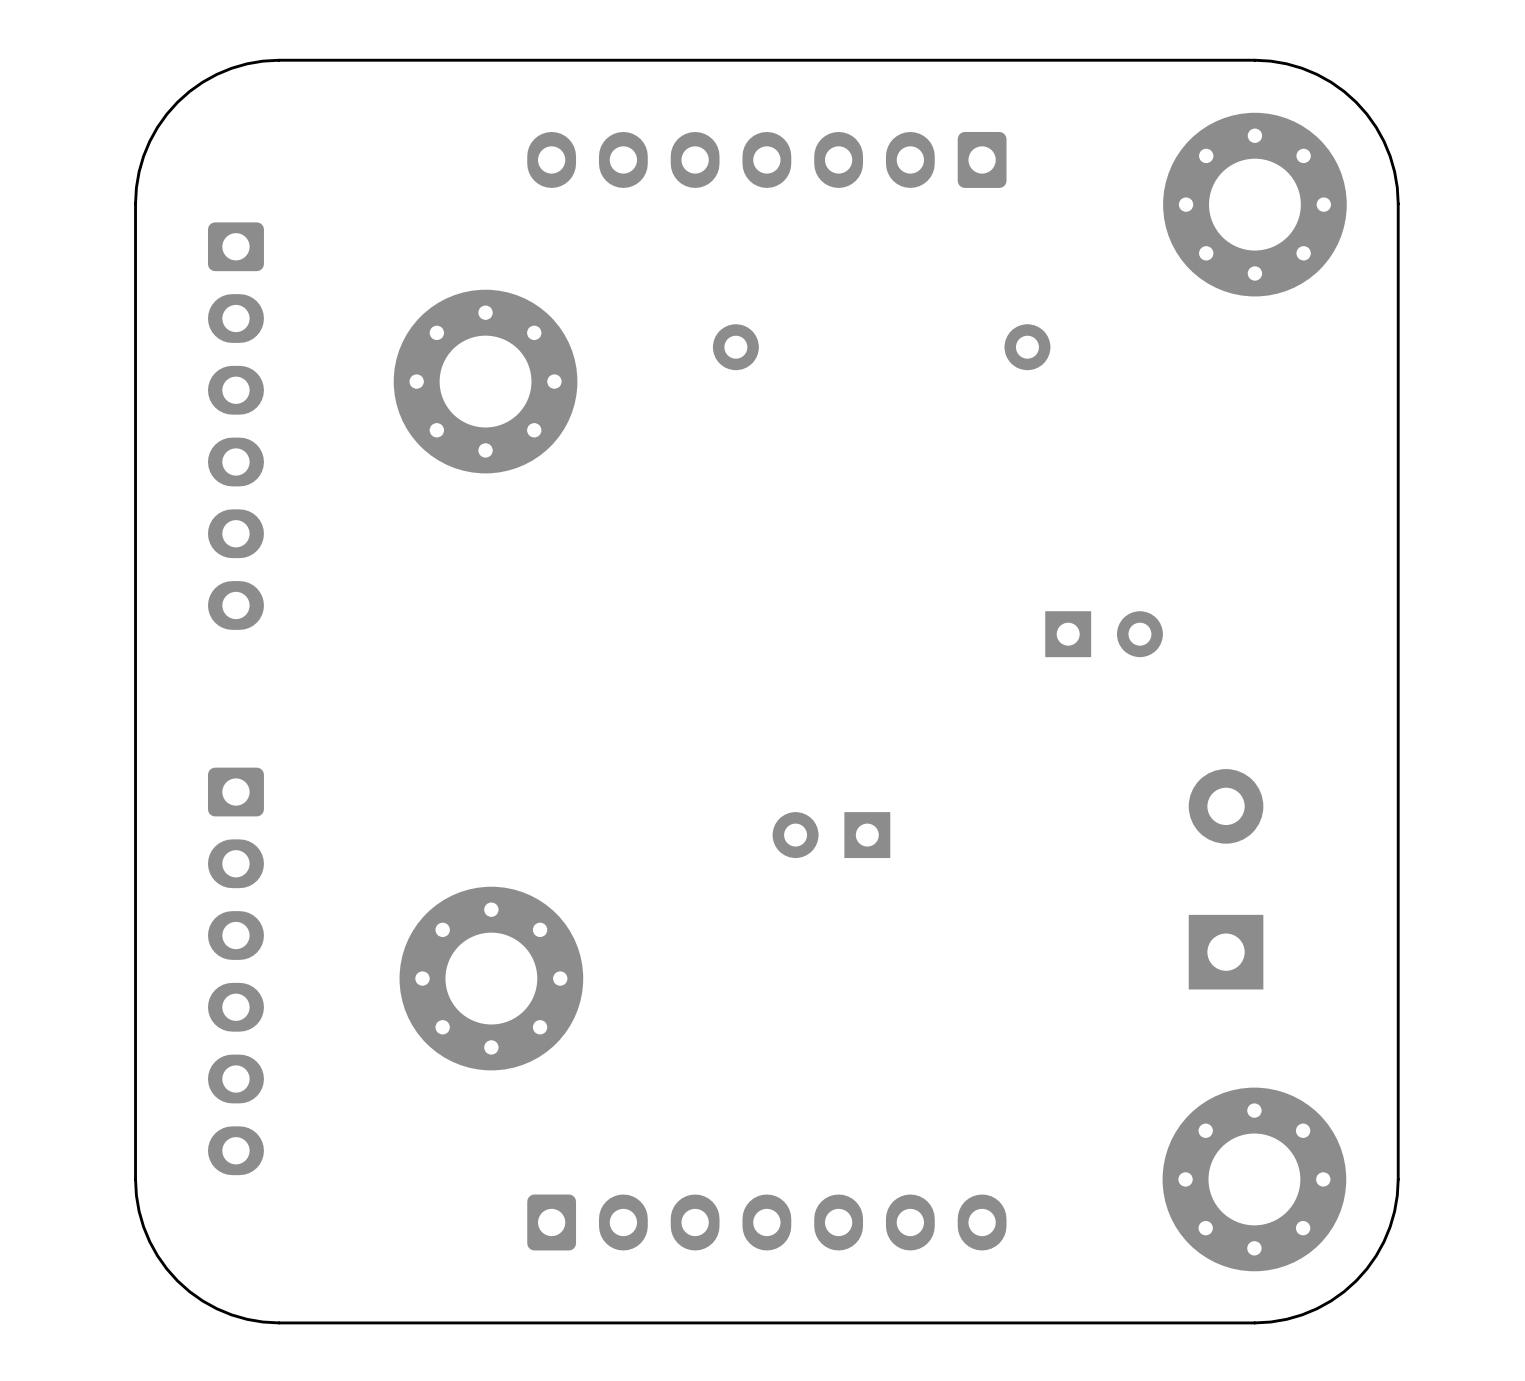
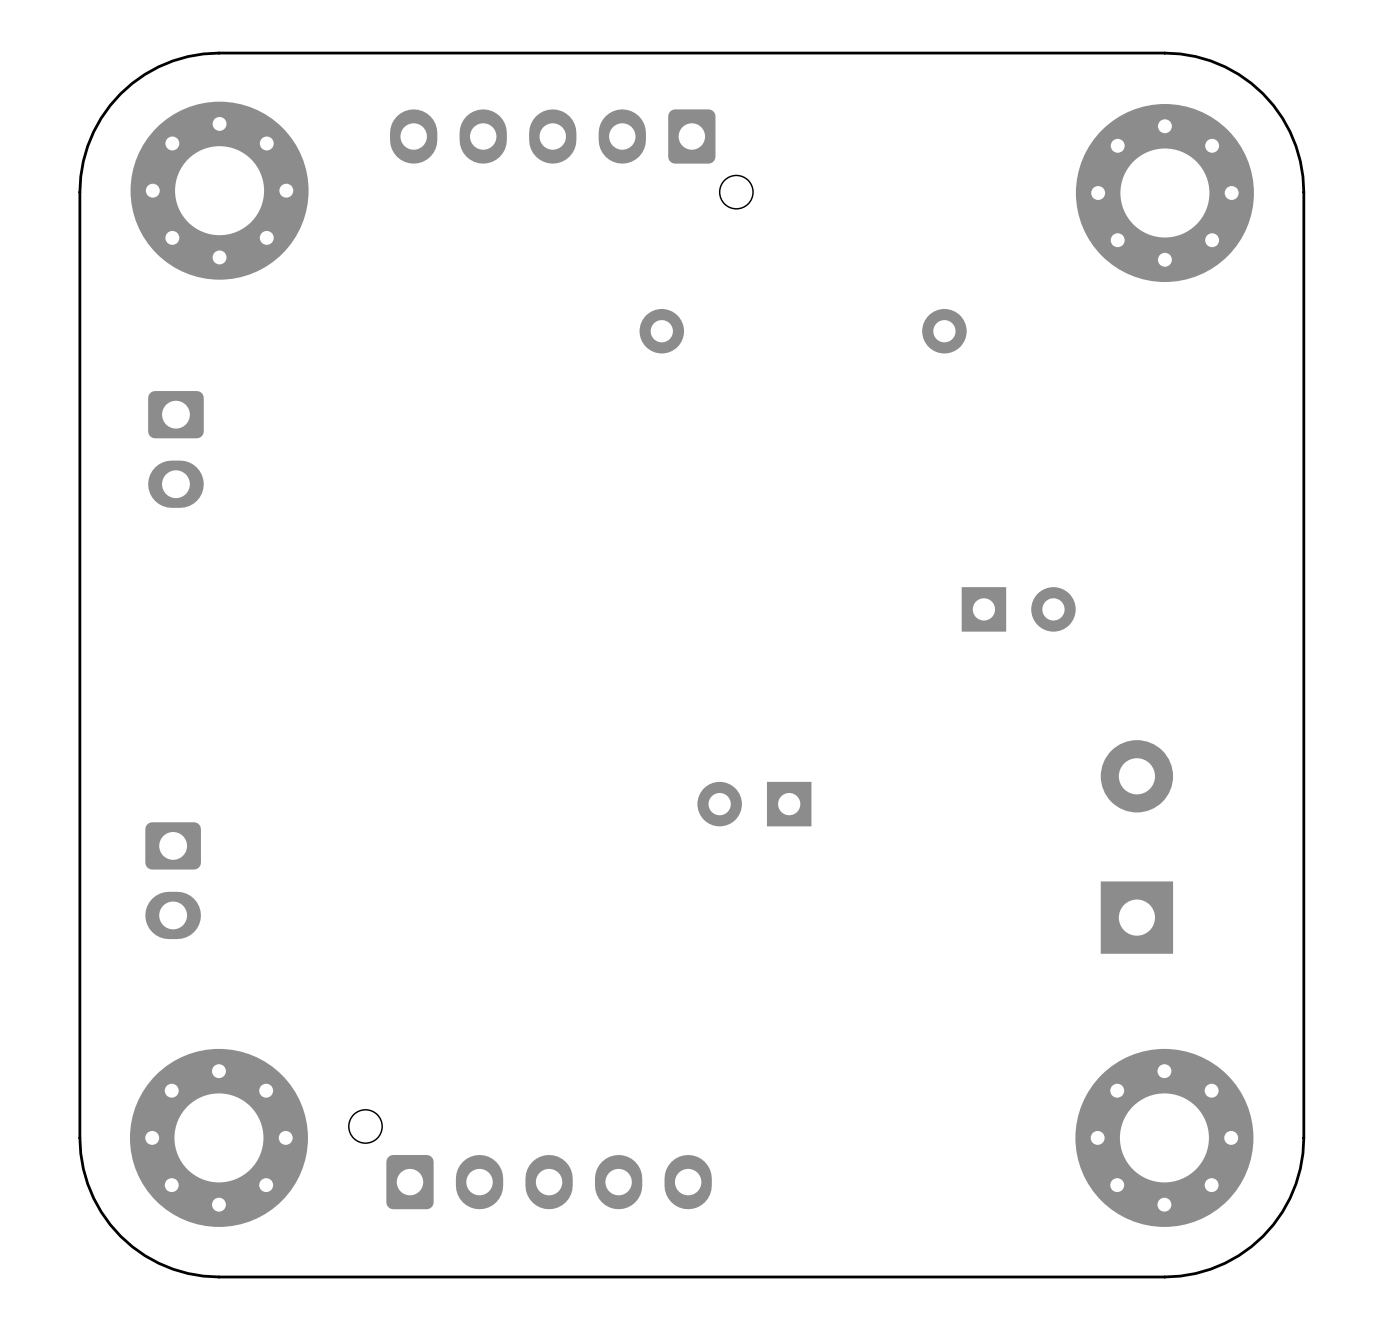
part: (766, 159) -> none
part: none -> (571, 159)
part position: (485, 381) -> (219, 190)
part: (235, 426) -> none
part: none -> (175, 449)
part: none -> (173, 880)
part: (235, 971) -> none
part position: (491, 978) -> (218, 1137)
part: none -> (530, 1159)
part: (766, 1222) -> none

